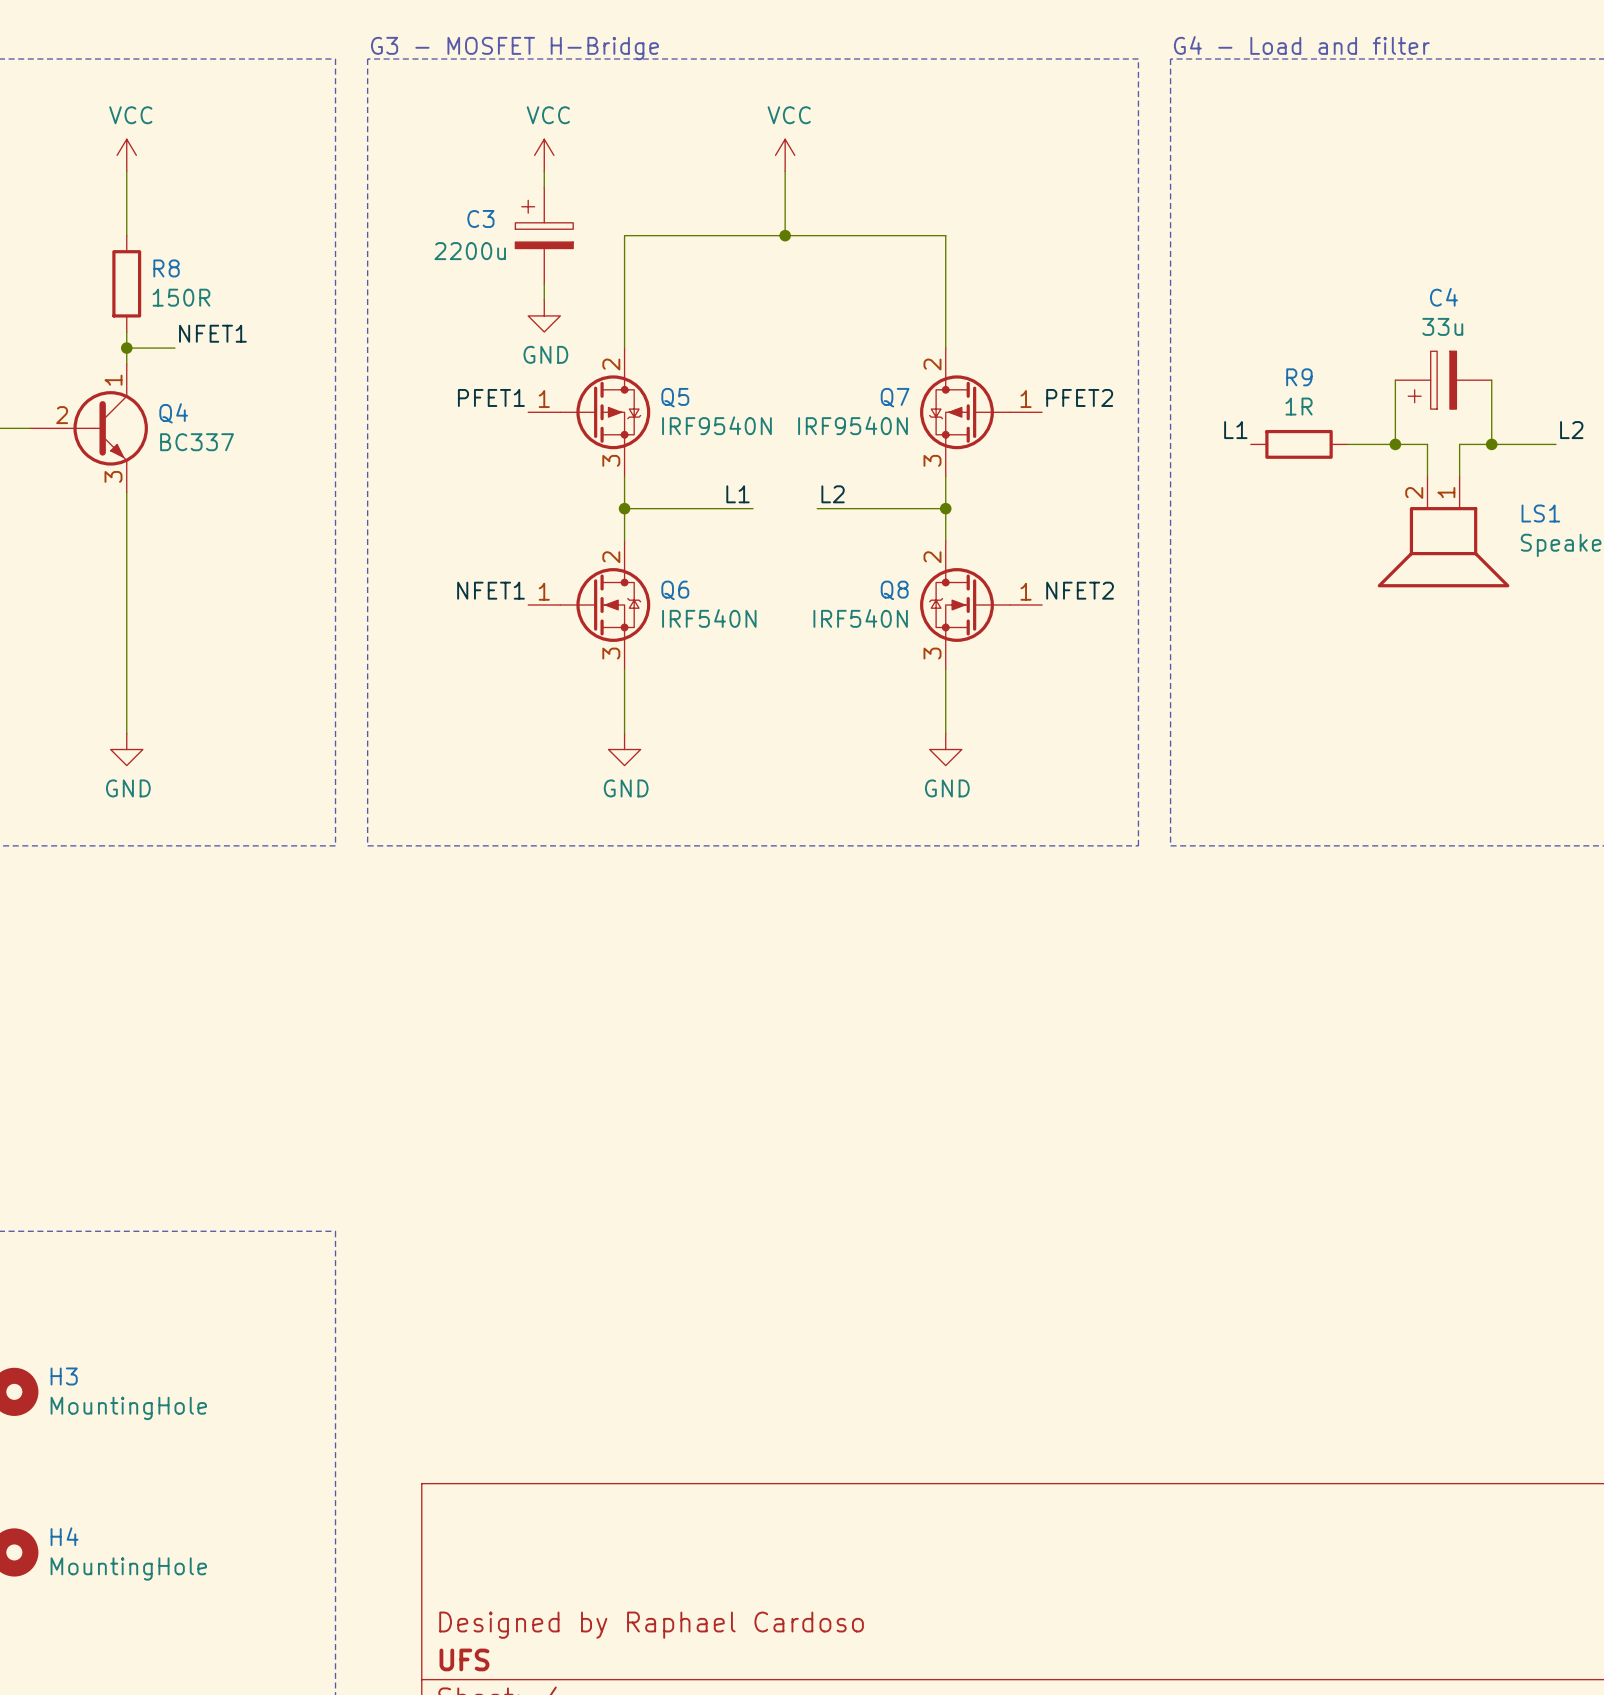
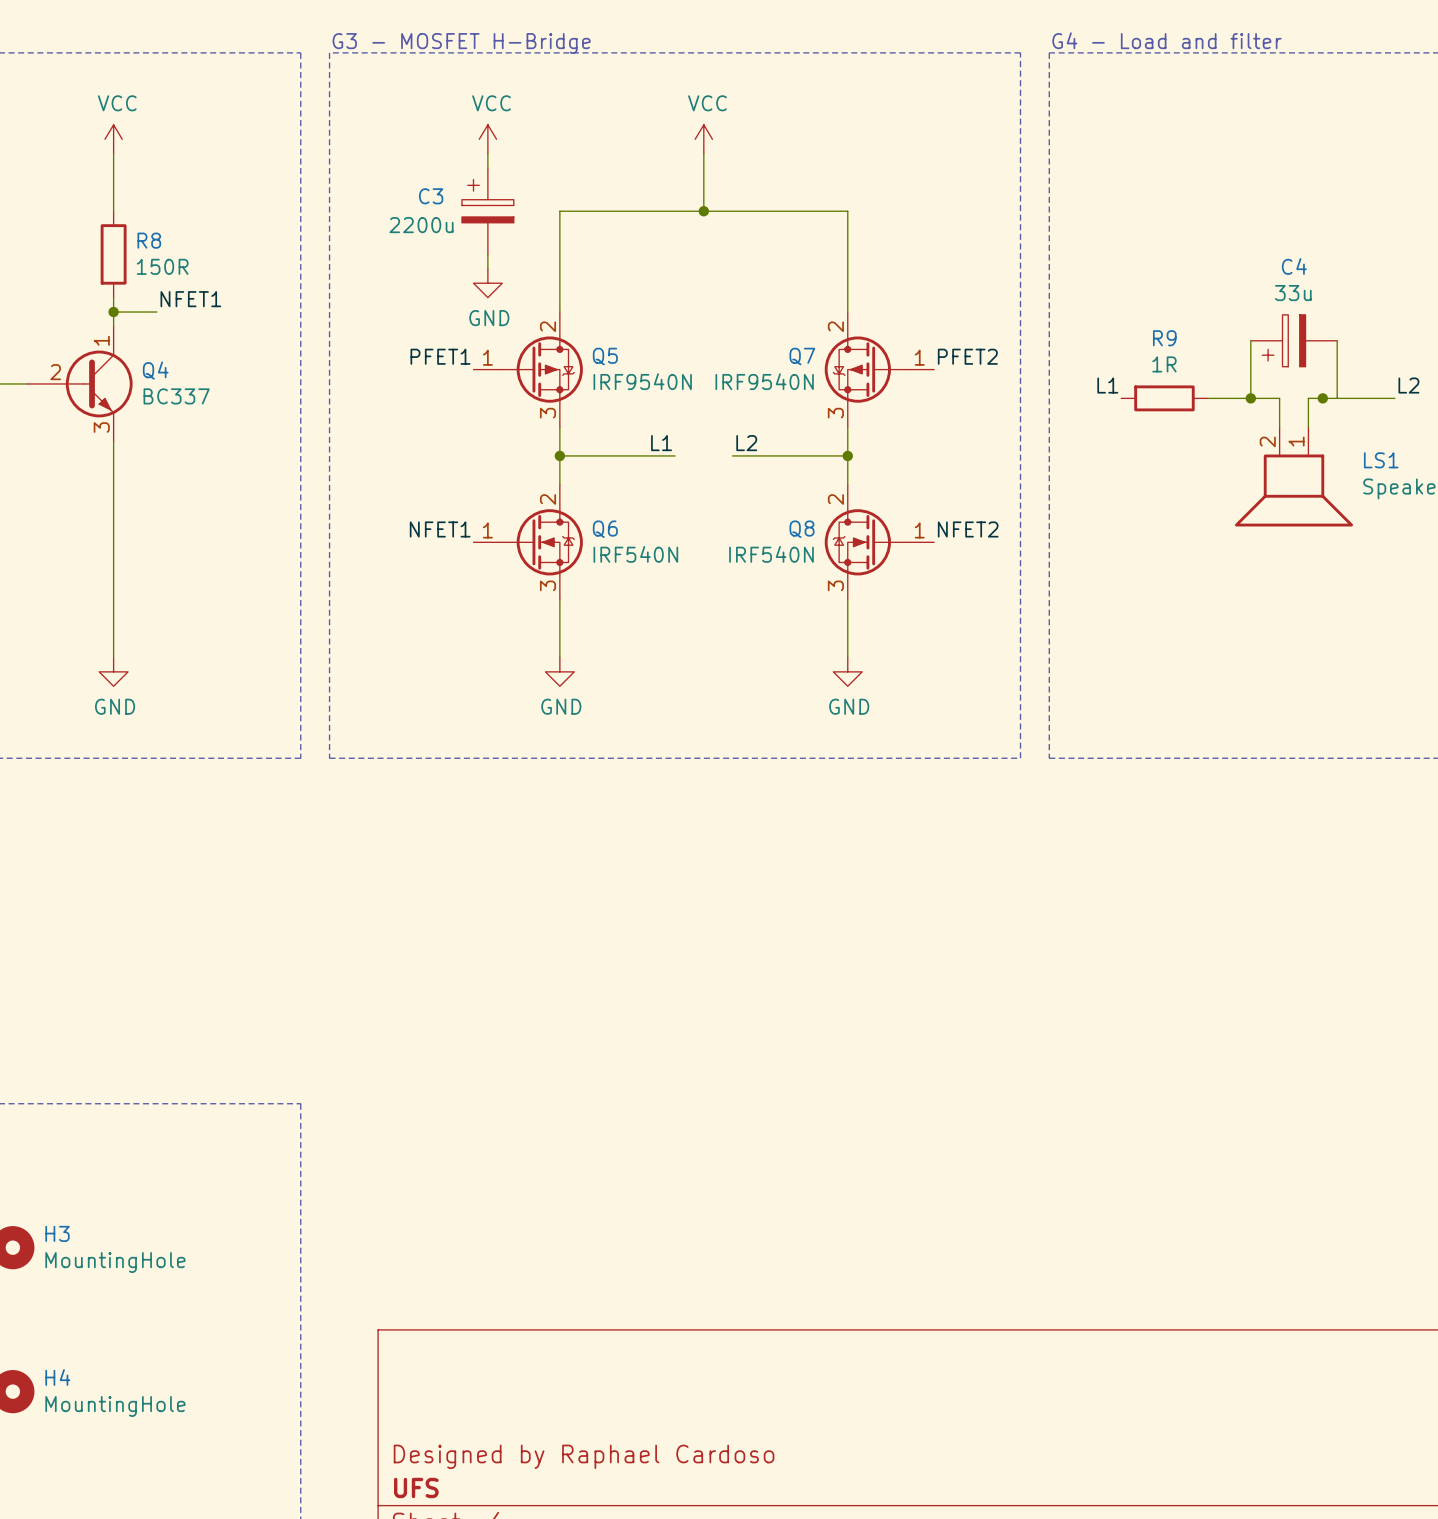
junction position: (1491, 444) -> (1322, 398)

